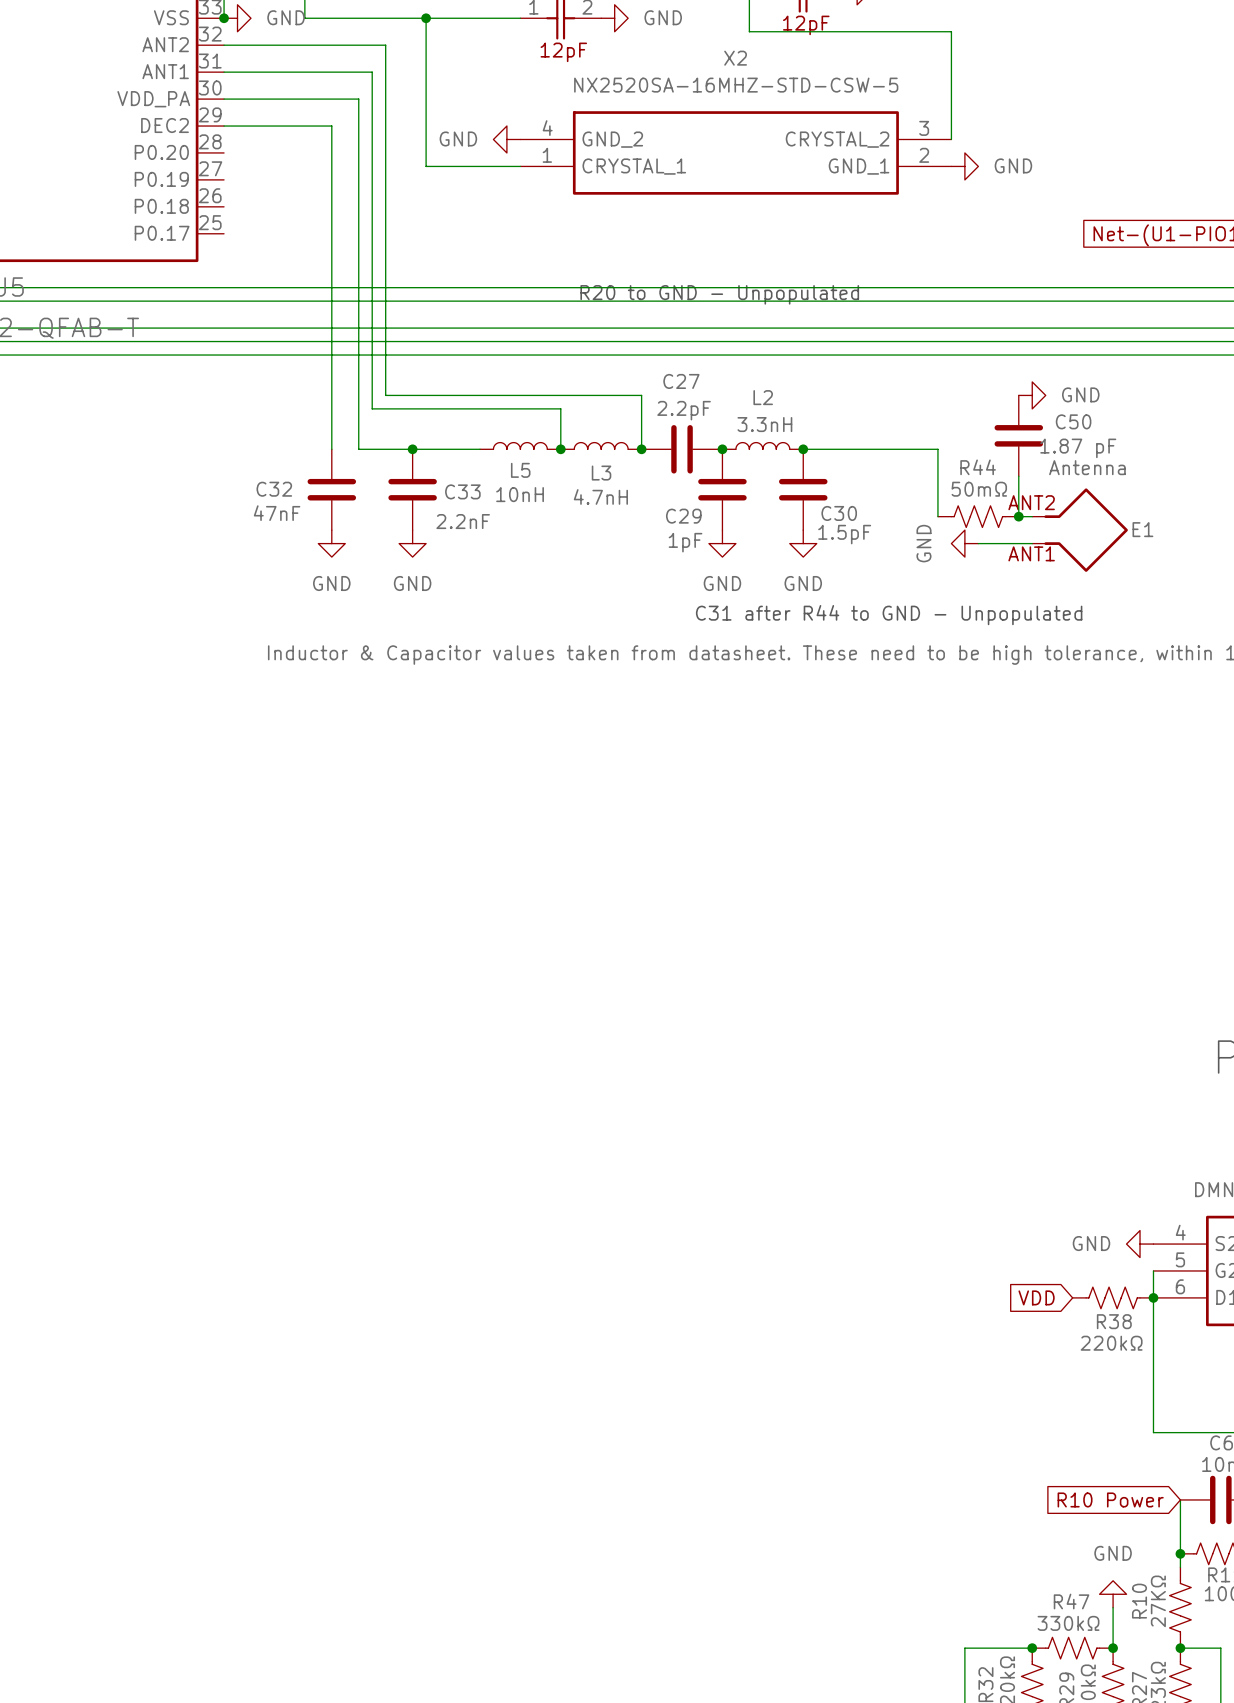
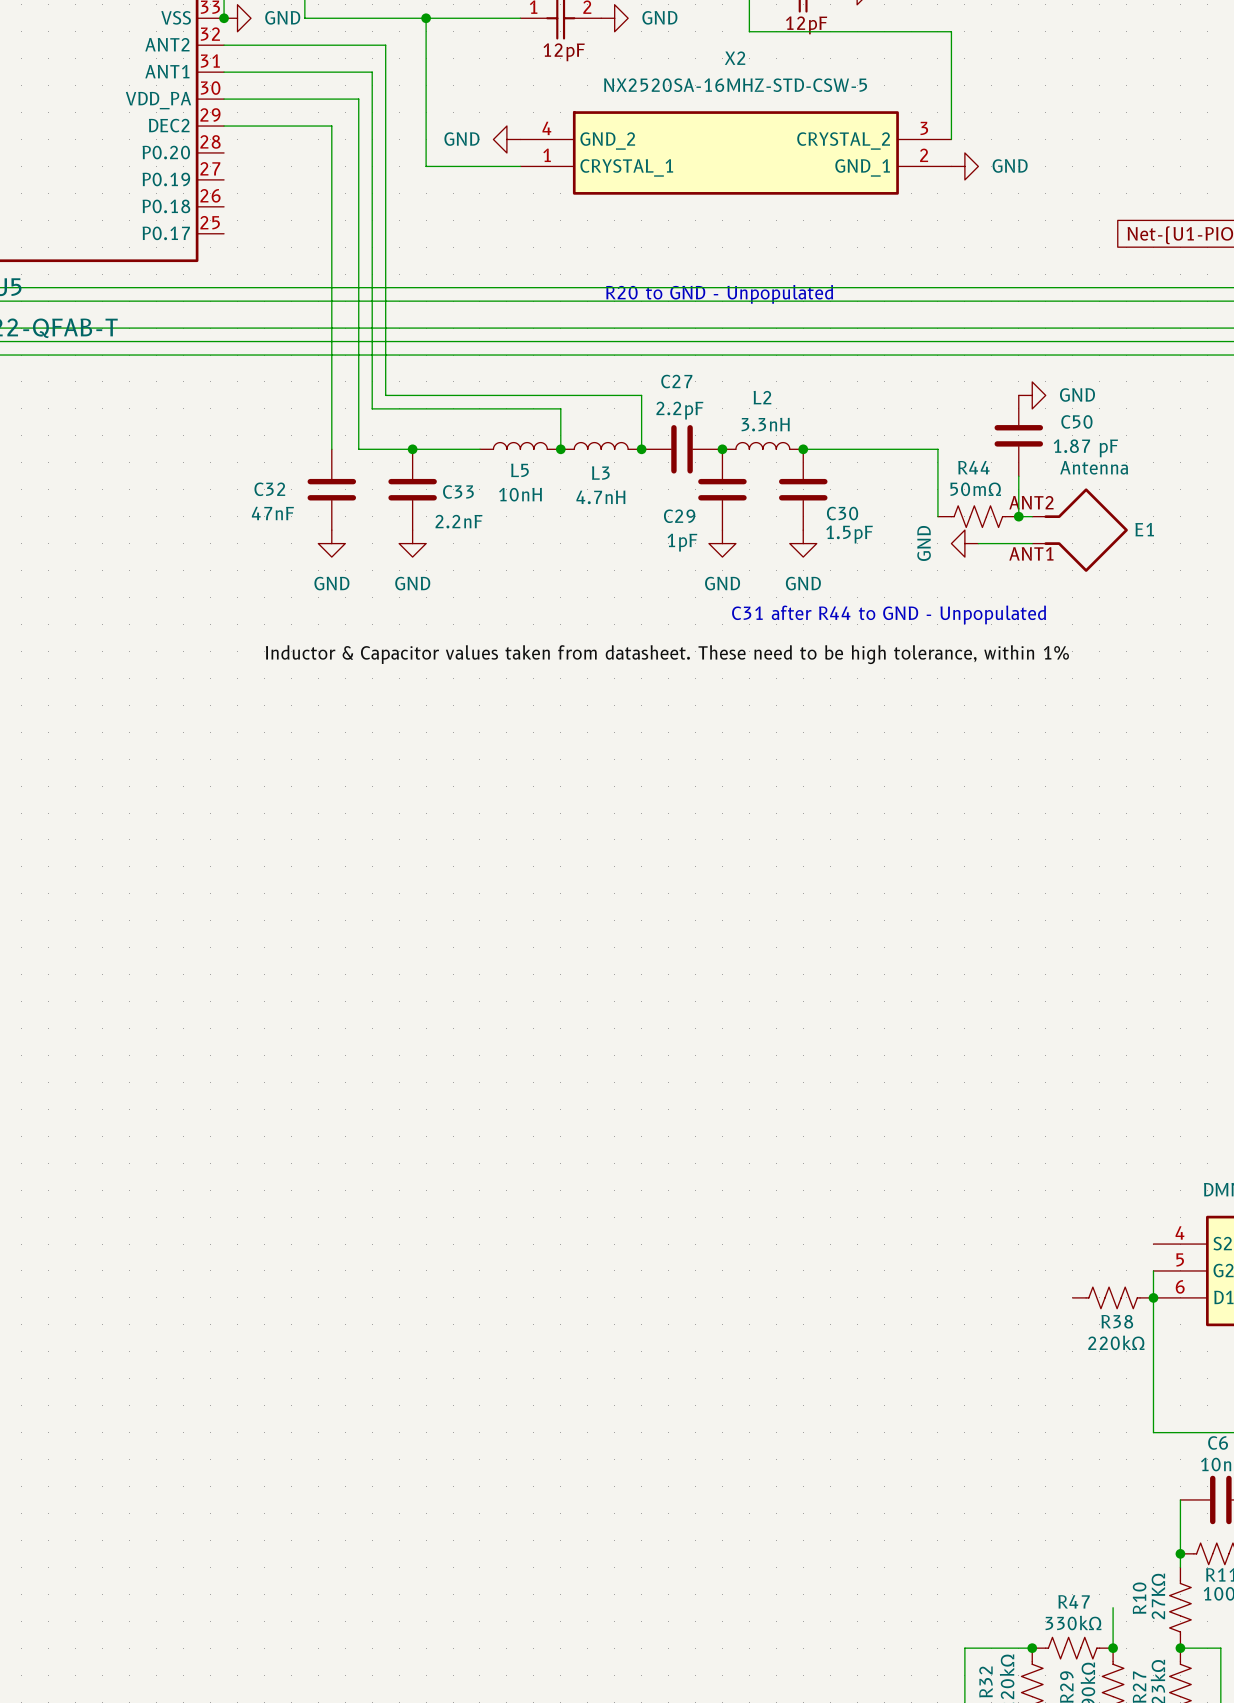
power symbol: GND (1140, 1244) -> none
global label: VDD (1036, 1297) -> none
global label: R10 Power (1110, 1499) -> none
power symbol: GND (1113, 1594) -> none

